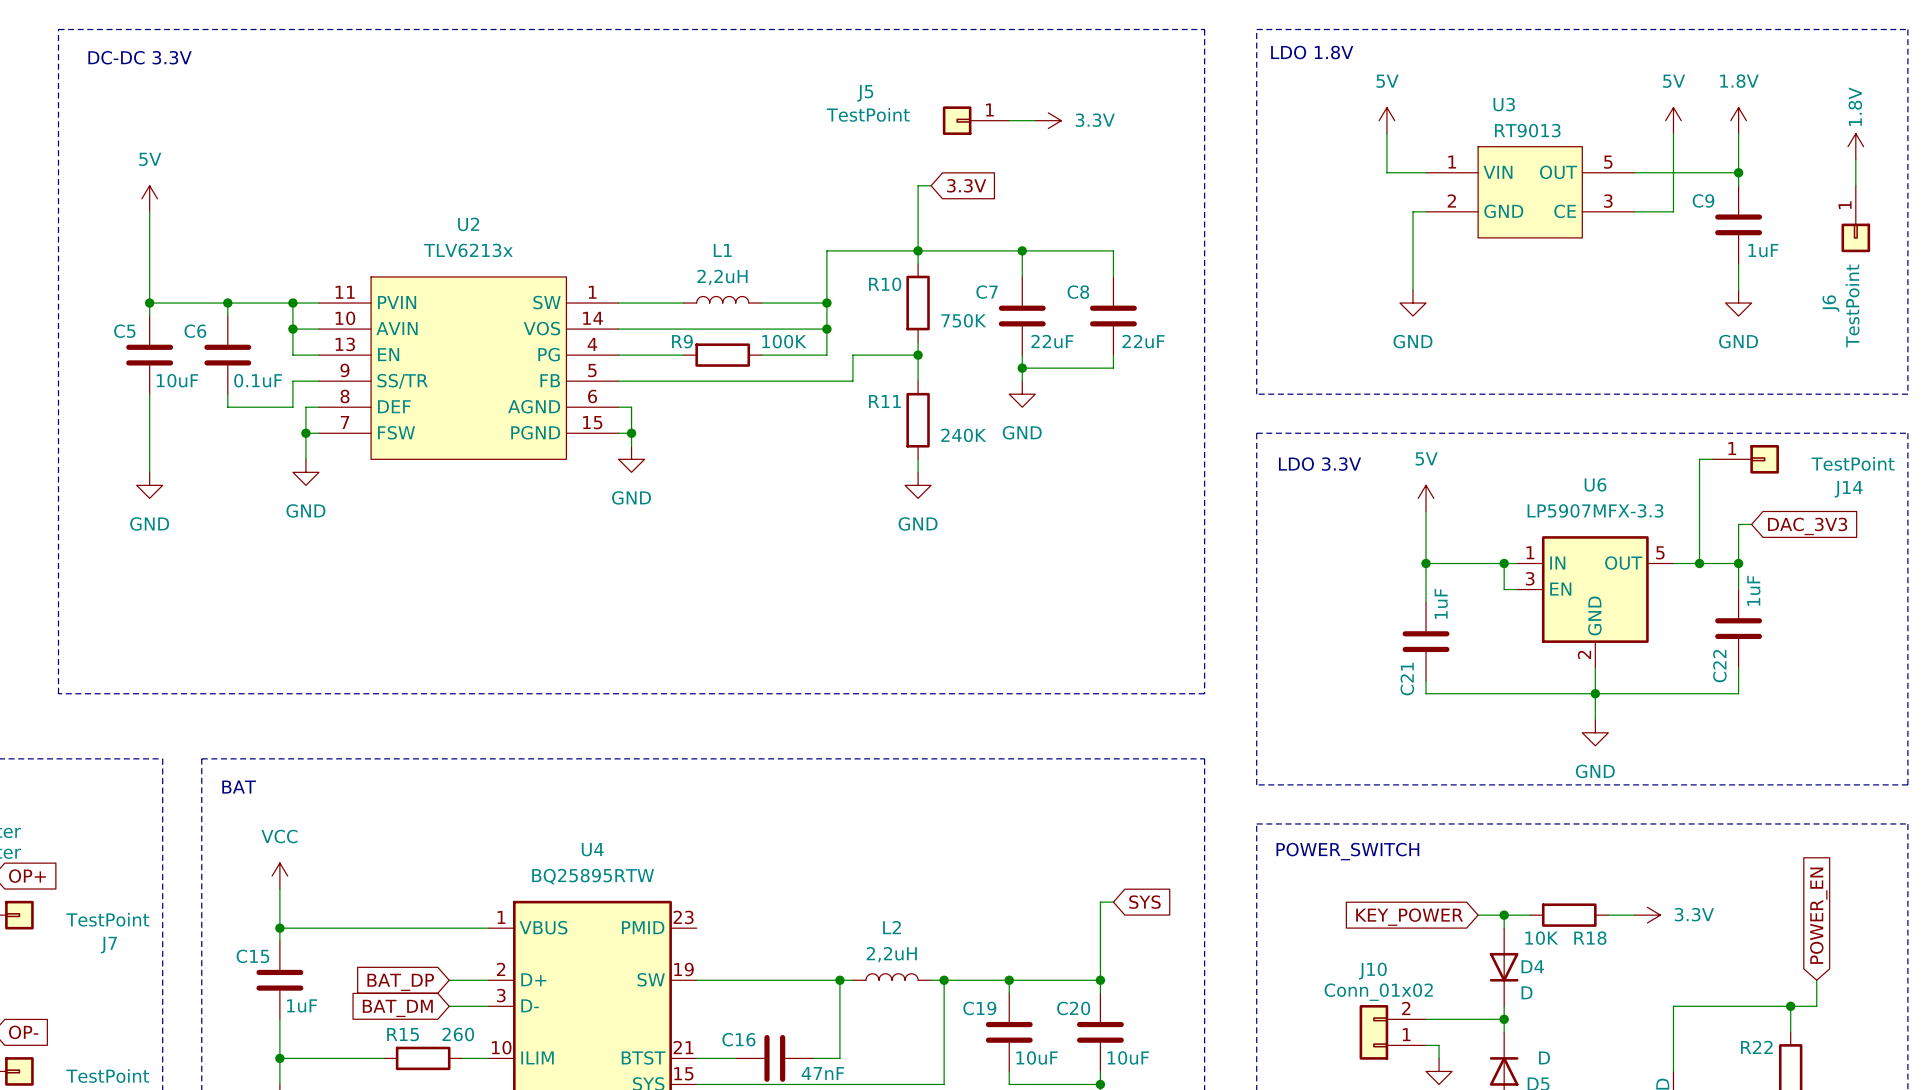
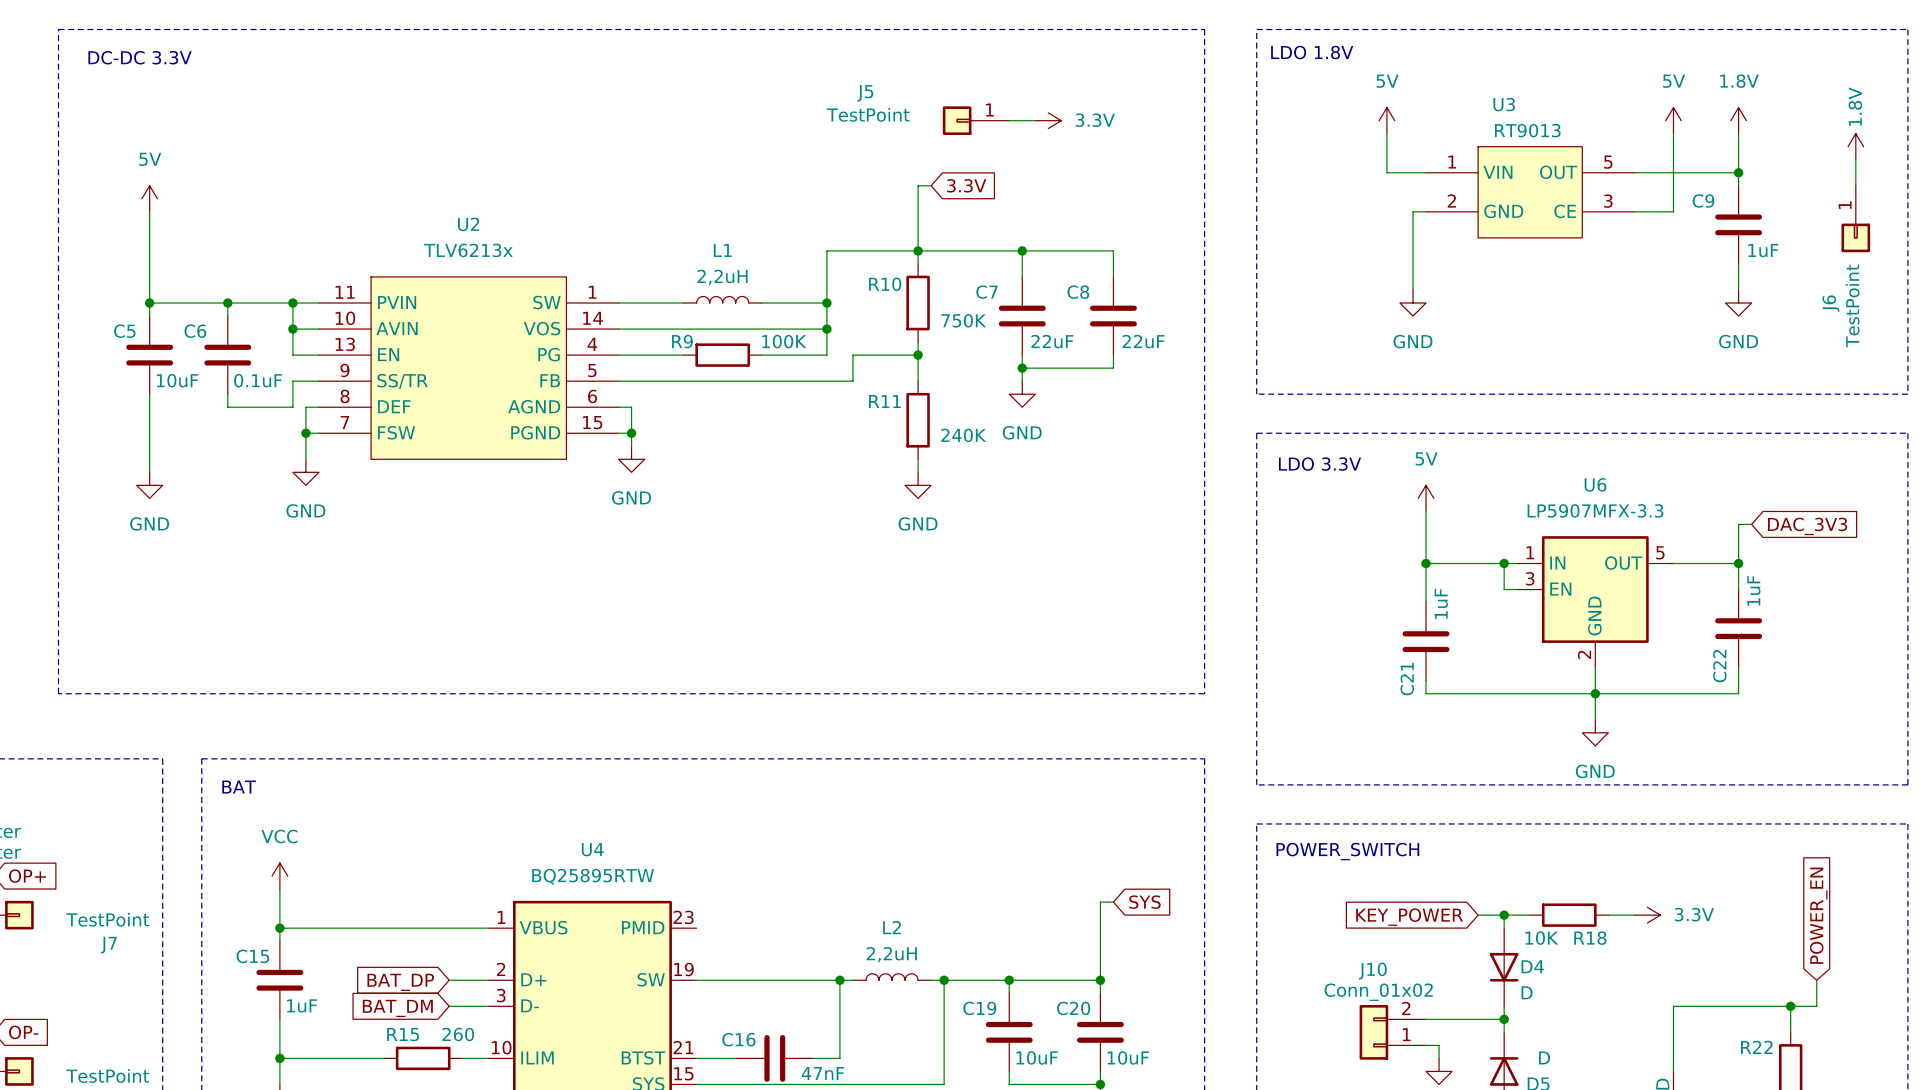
wire: (1712, 459) (1699, 459) (1699, 563) -> none
J14: TestPoint (1745, 459) -> none
junction: (1699, 563) -> none

